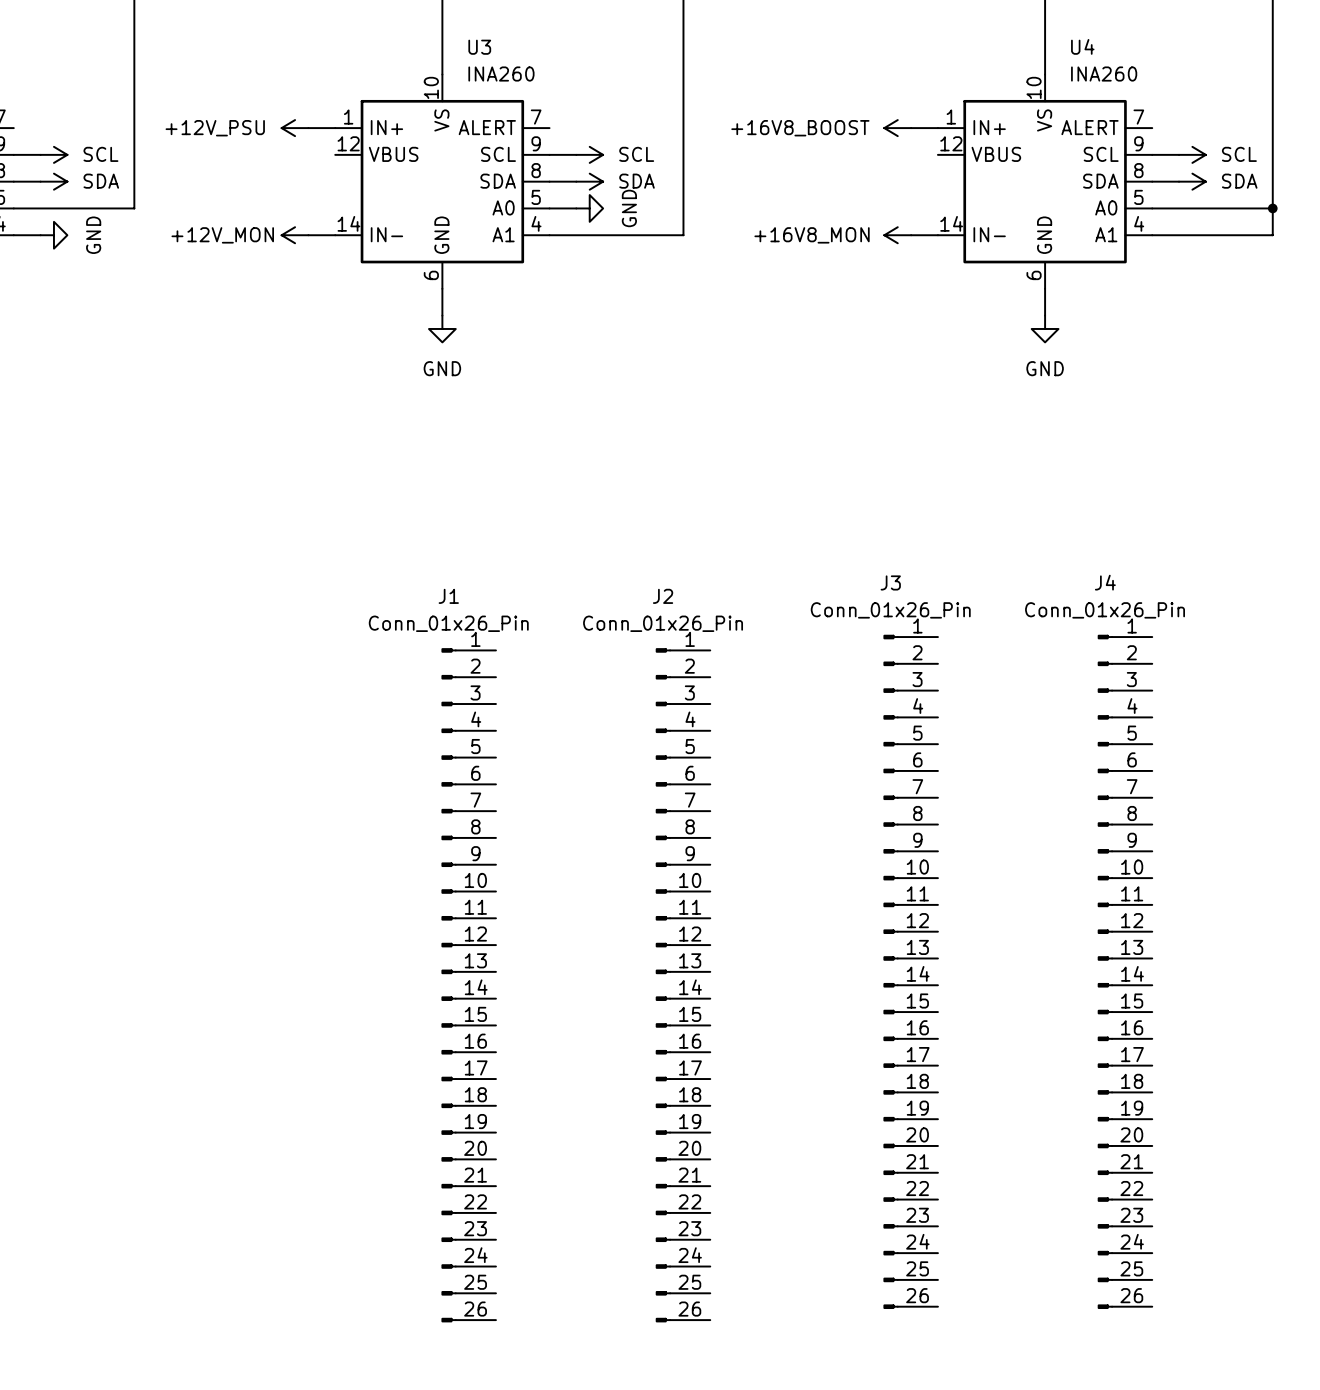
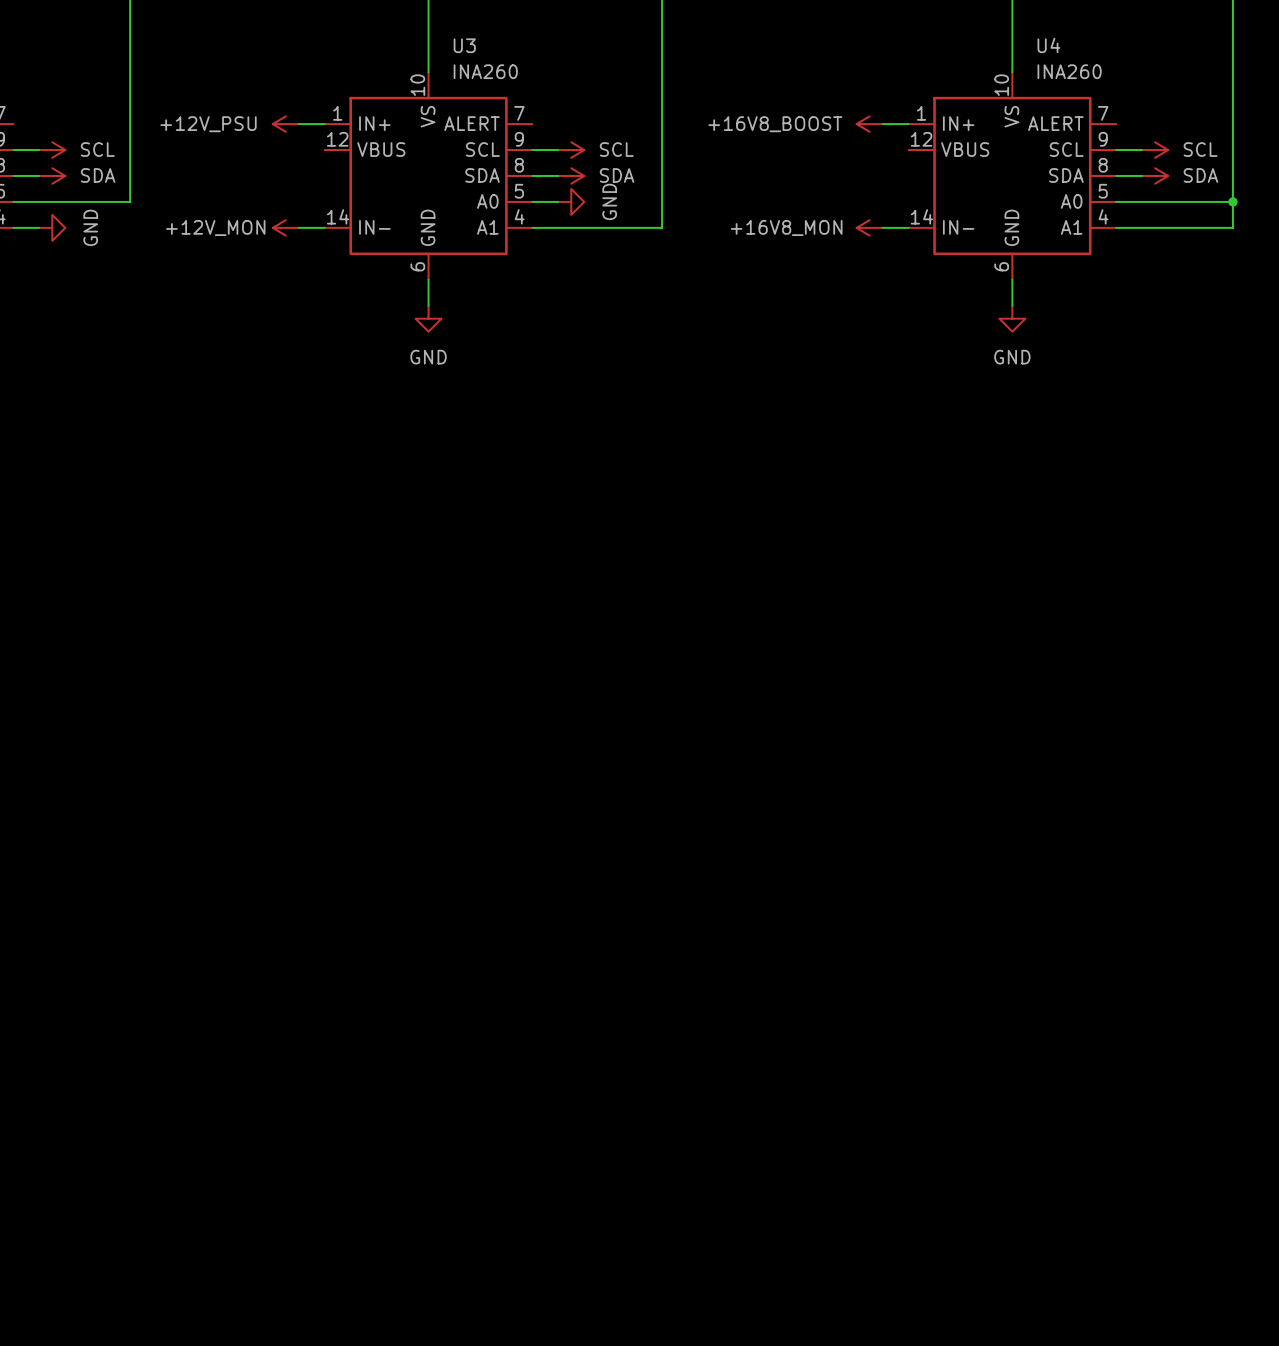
J3: Conn_01x26_Pin (910, 971) -> none
J4: Conn_01x26_Pin (1125, 971) -> none
J1: Conn_01x26_Pin (468, 985) -> none
J2: Conn_01x26_Pin (683, 985) -> none

